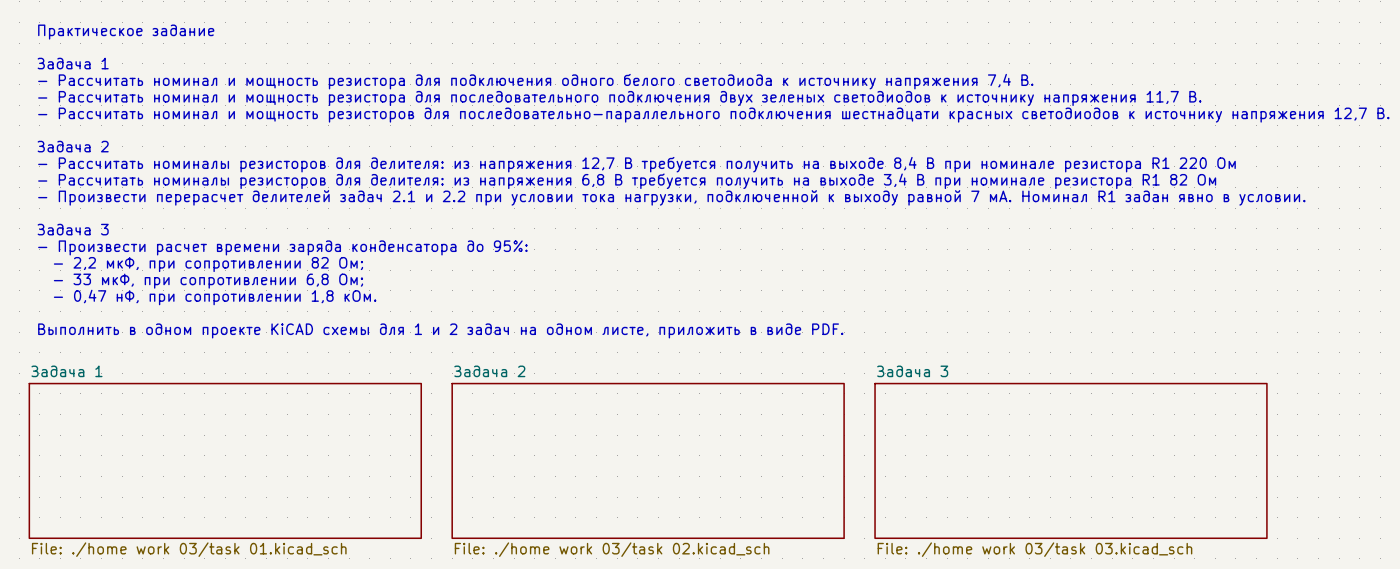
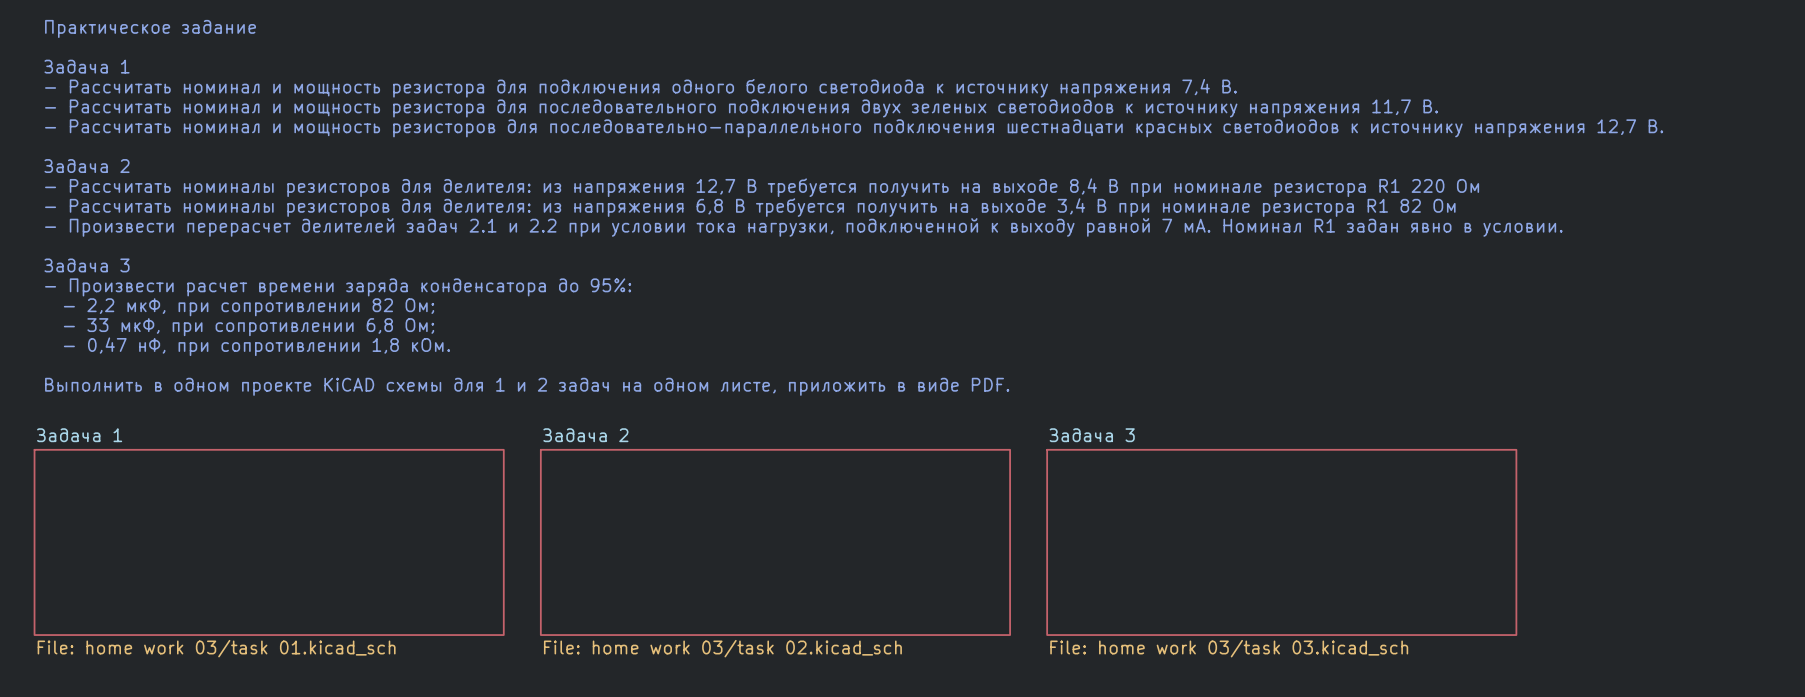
sheet Задача 1 value: File: ./home work 03/task 01.kicad_sch (189, 549) -> File: home work 03/task 01.kicad_sch (216, 648)
sheet Задача 2 value: File: ./home work 03/task 02.kicad_sch (612, 549) -> File: home work 03/task 02.kicad_sch (722, 648)
sheet Задача 3 value: File: ./home work 03/task 03.kicad_sch (1034, 549) -> File: home work 03/task 03.kicad_sch (1229, 648)

